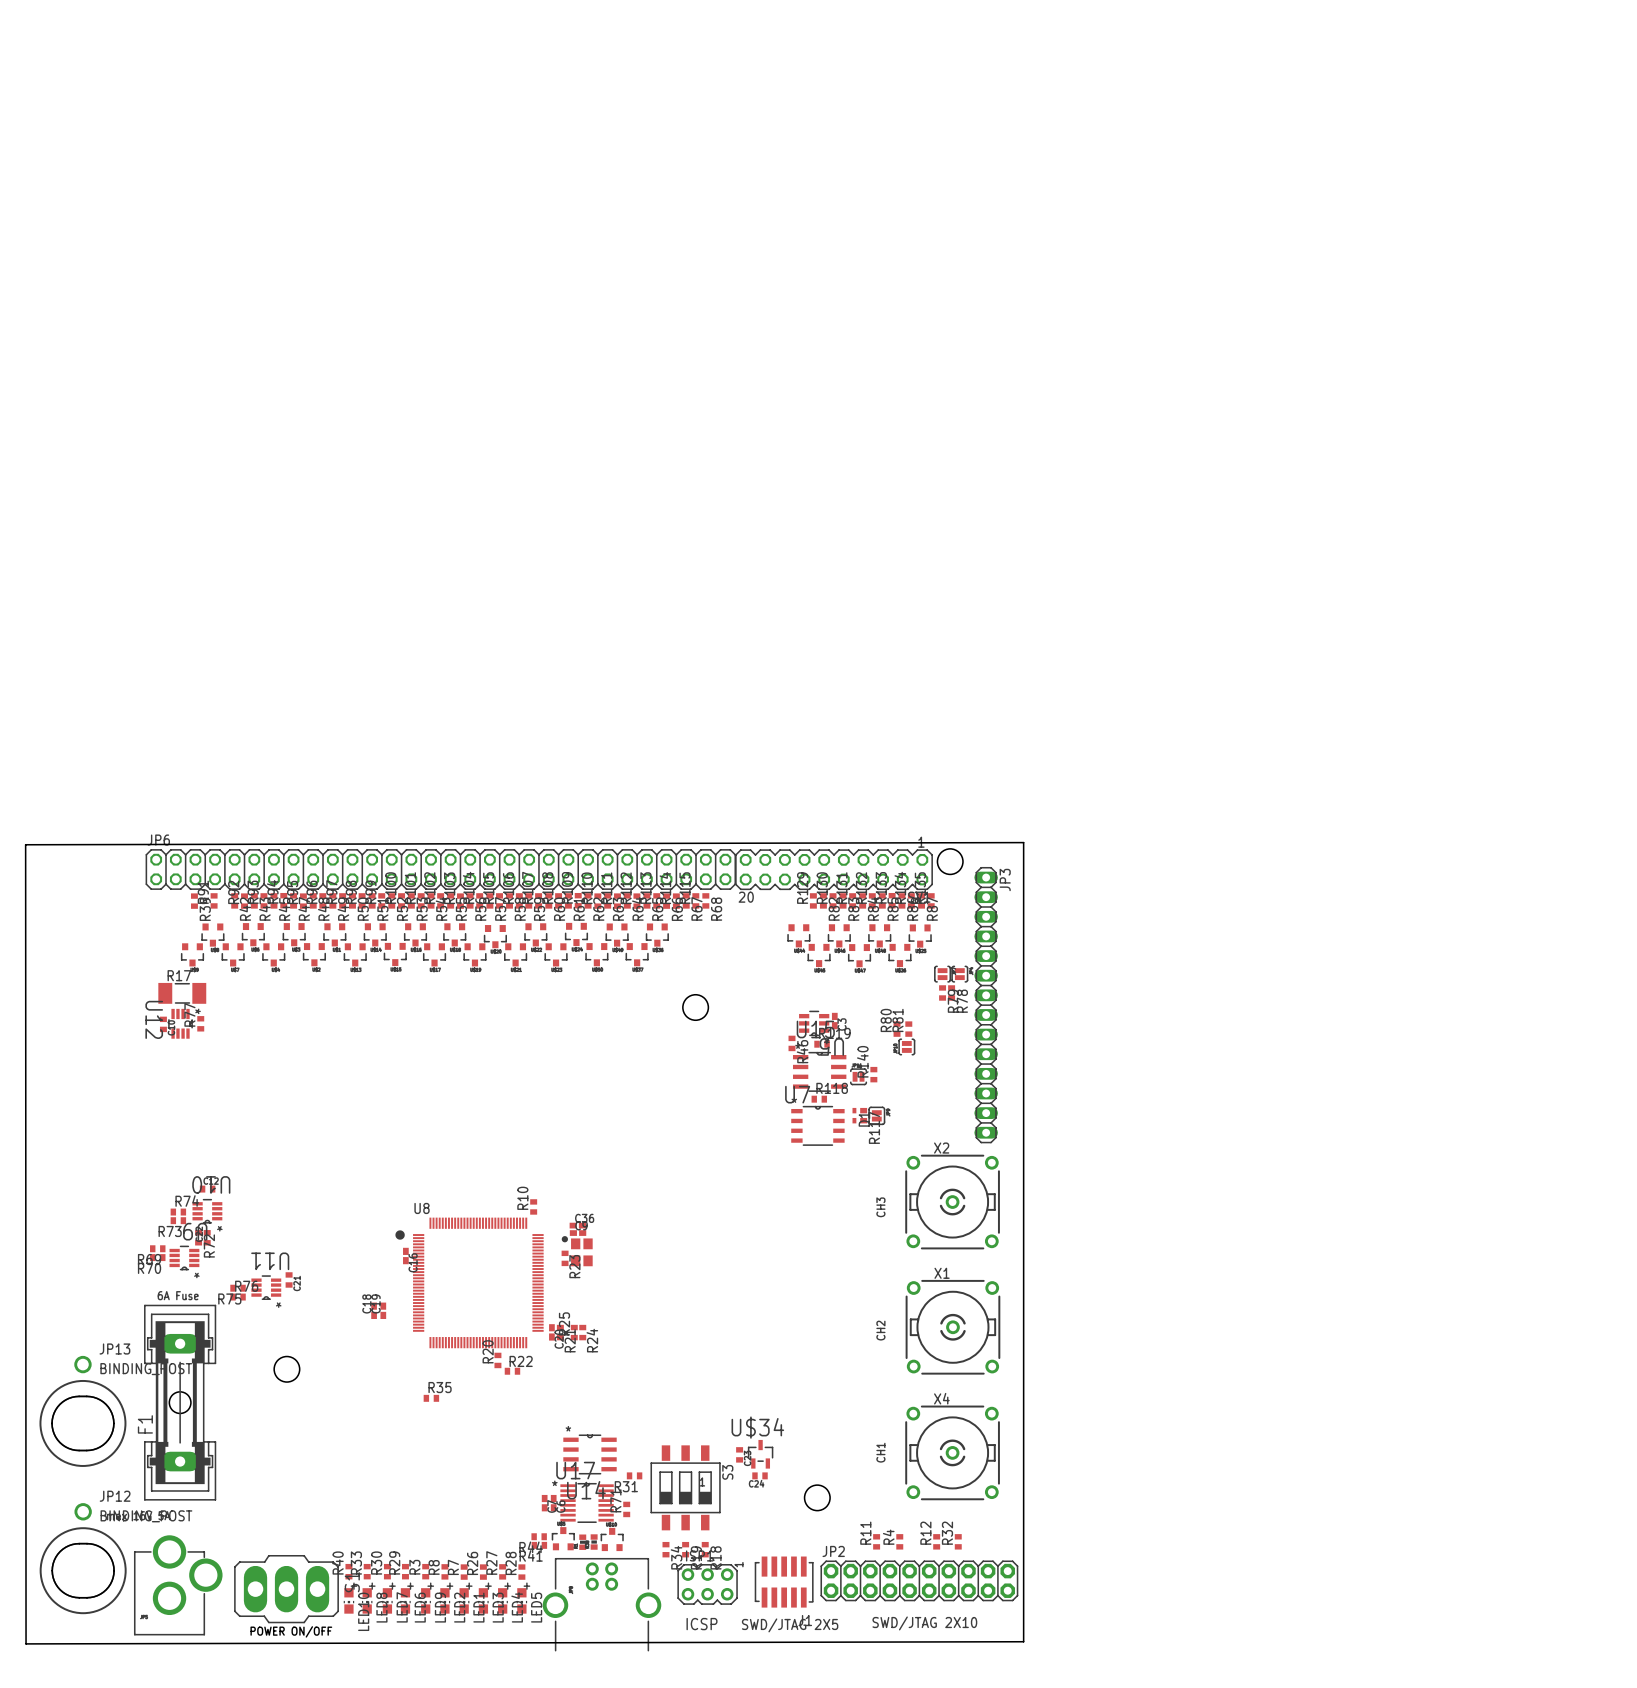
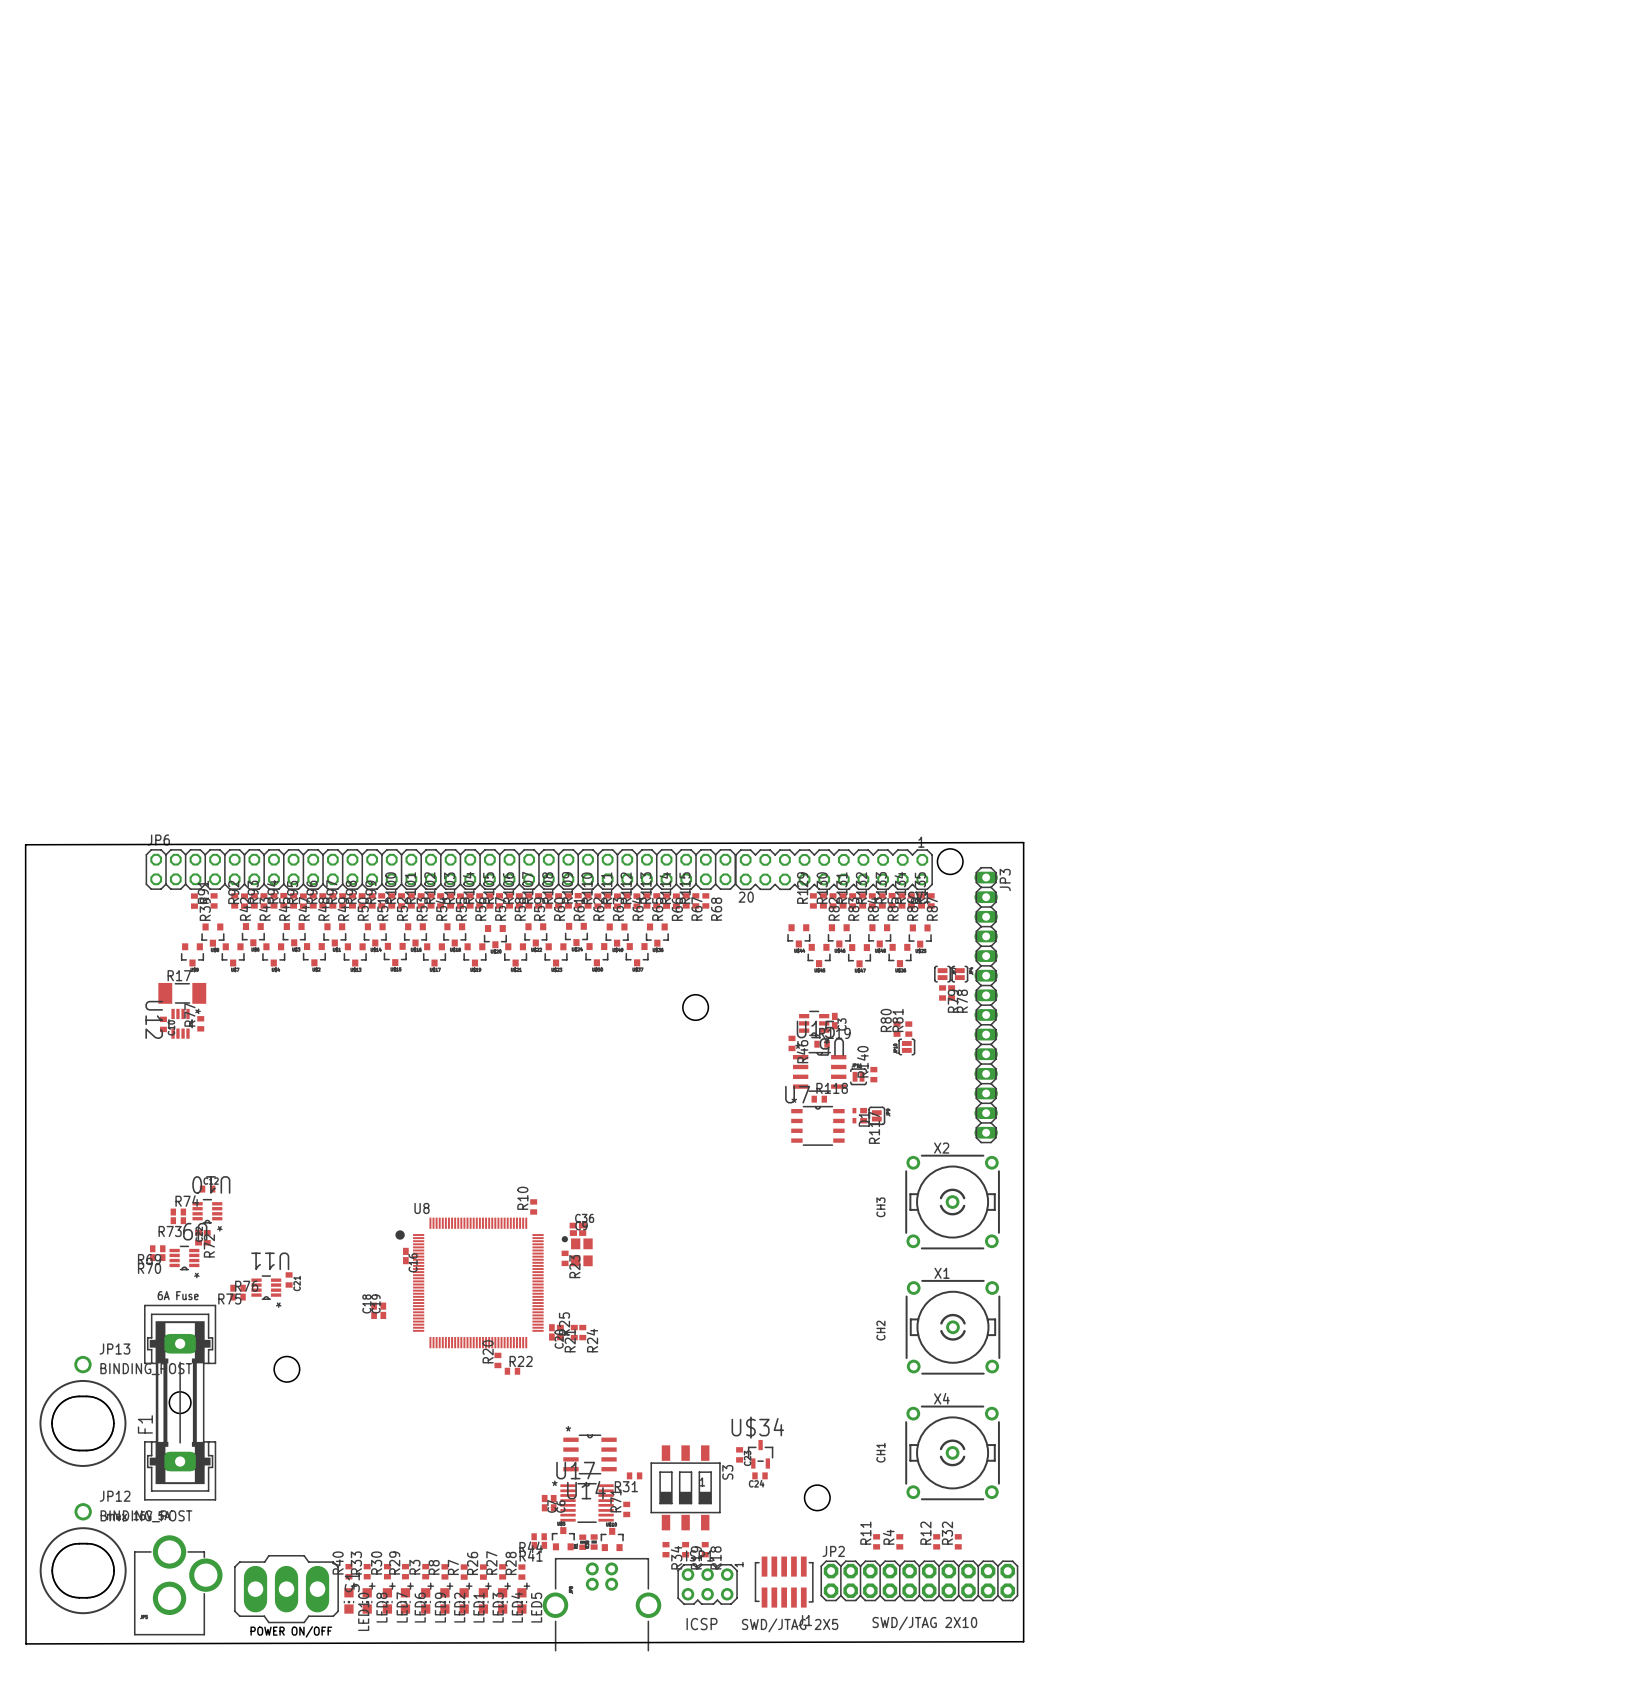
R35: (431, 1398) -> none

